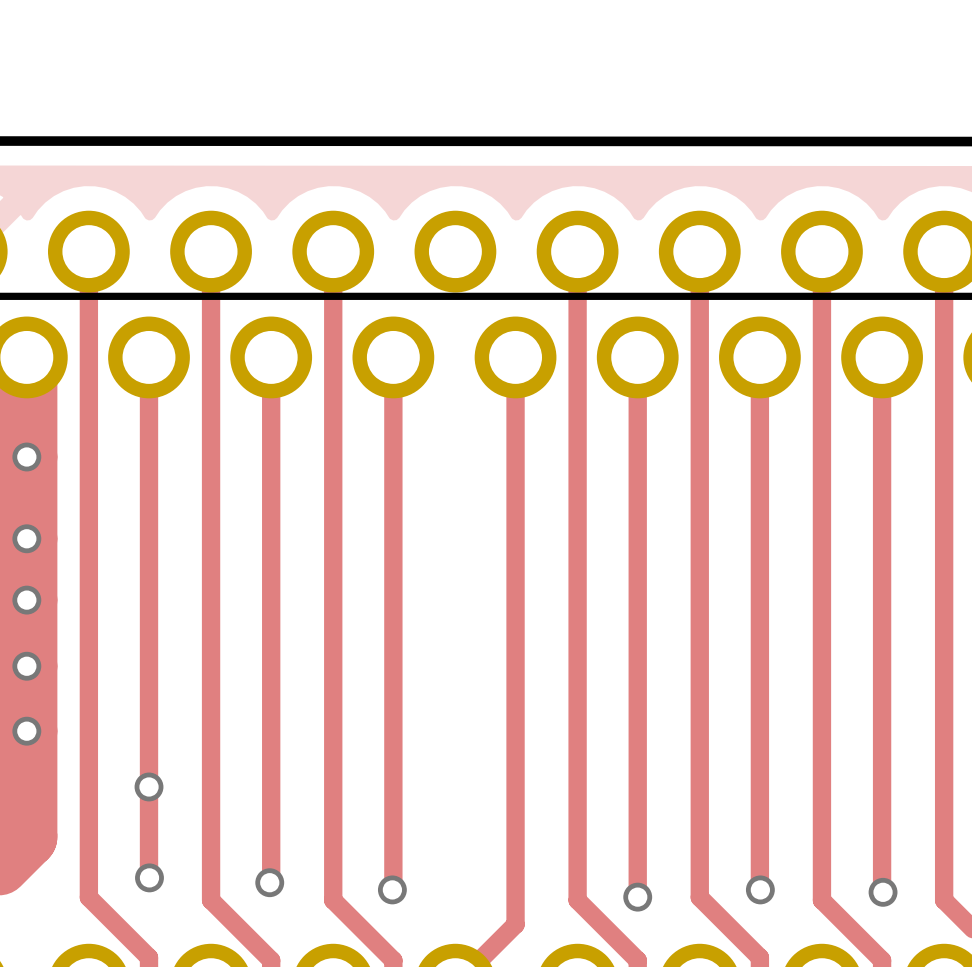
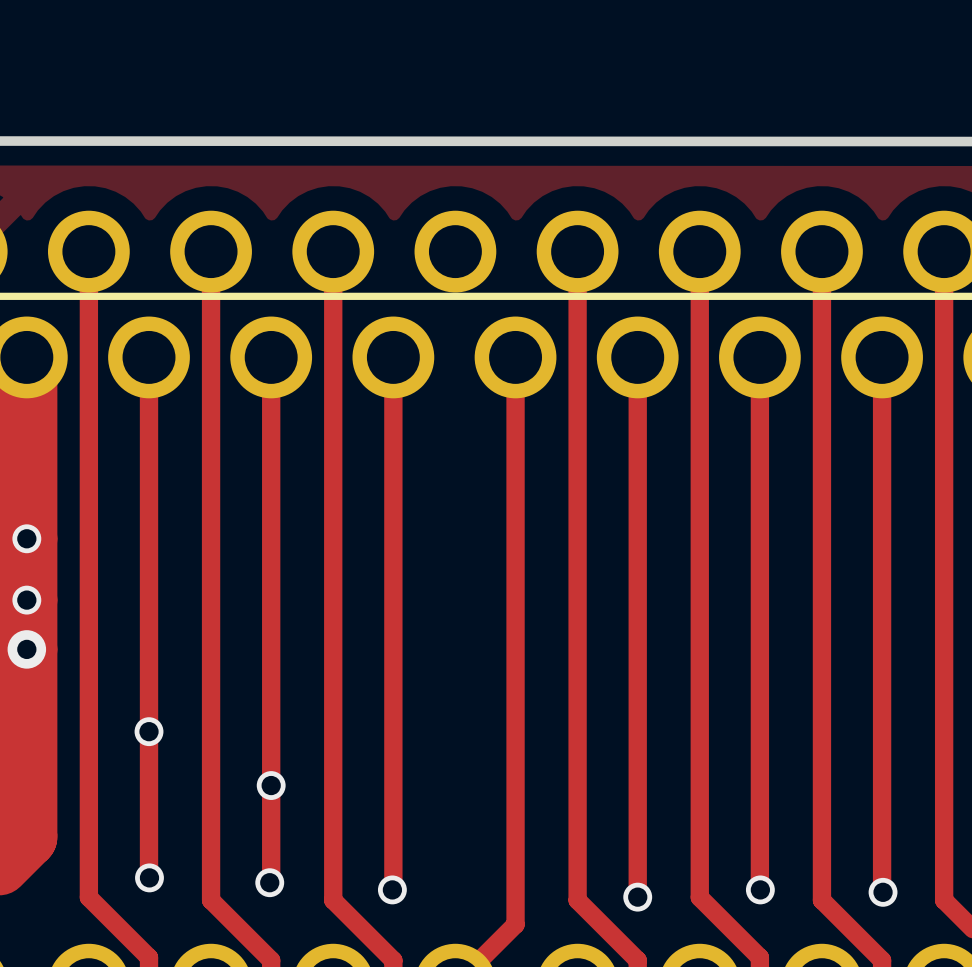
via: (26, 457) -> none
via size: [12, 651, 42, 681] -> [7, 630, 47, 669]
via: (26, 731) -> none
via: none -> (271, 785)
via position: (149, 786) -> (149, 731)

